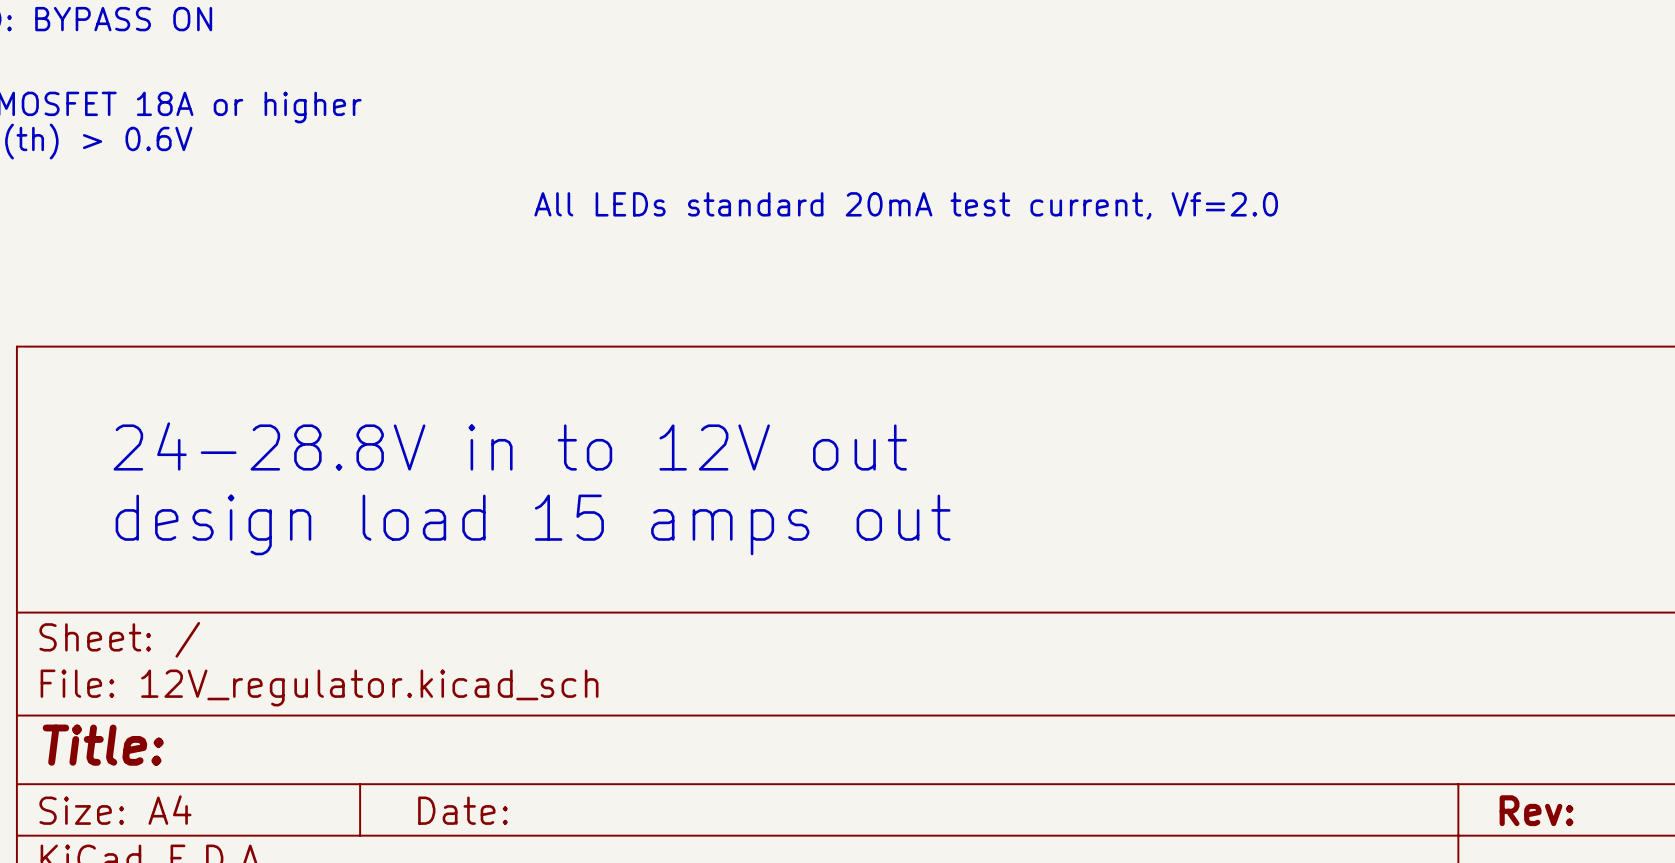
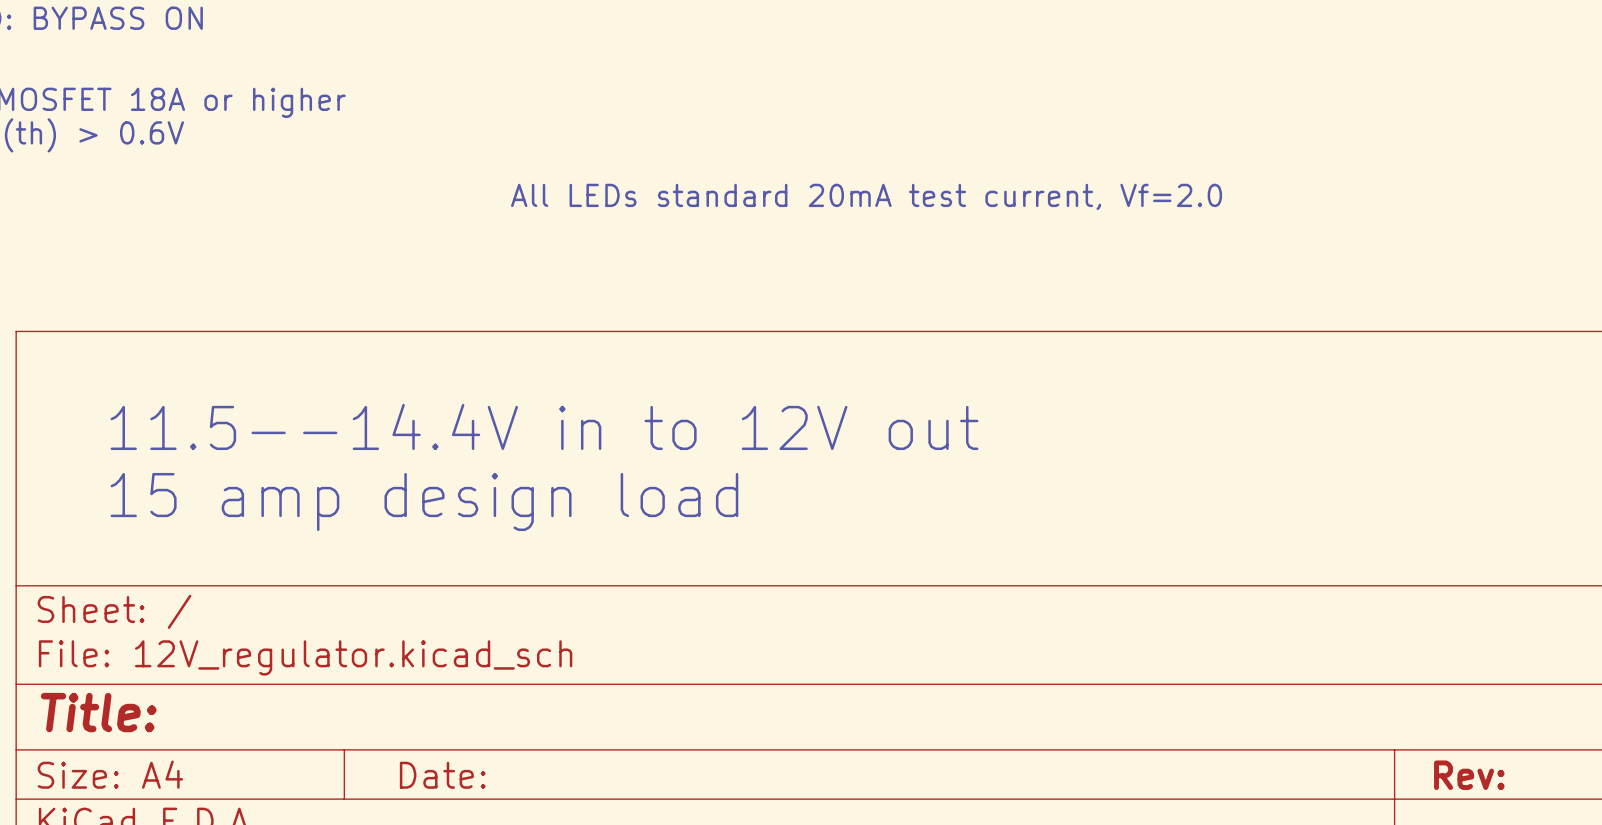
text: 24-28.8V in to 12V out (510, 446) -> 11.5--14.4V in to 12V out (544, 426)
text: design load 15 amps out (533, 524) -> 15 amp design load (424, 501)

